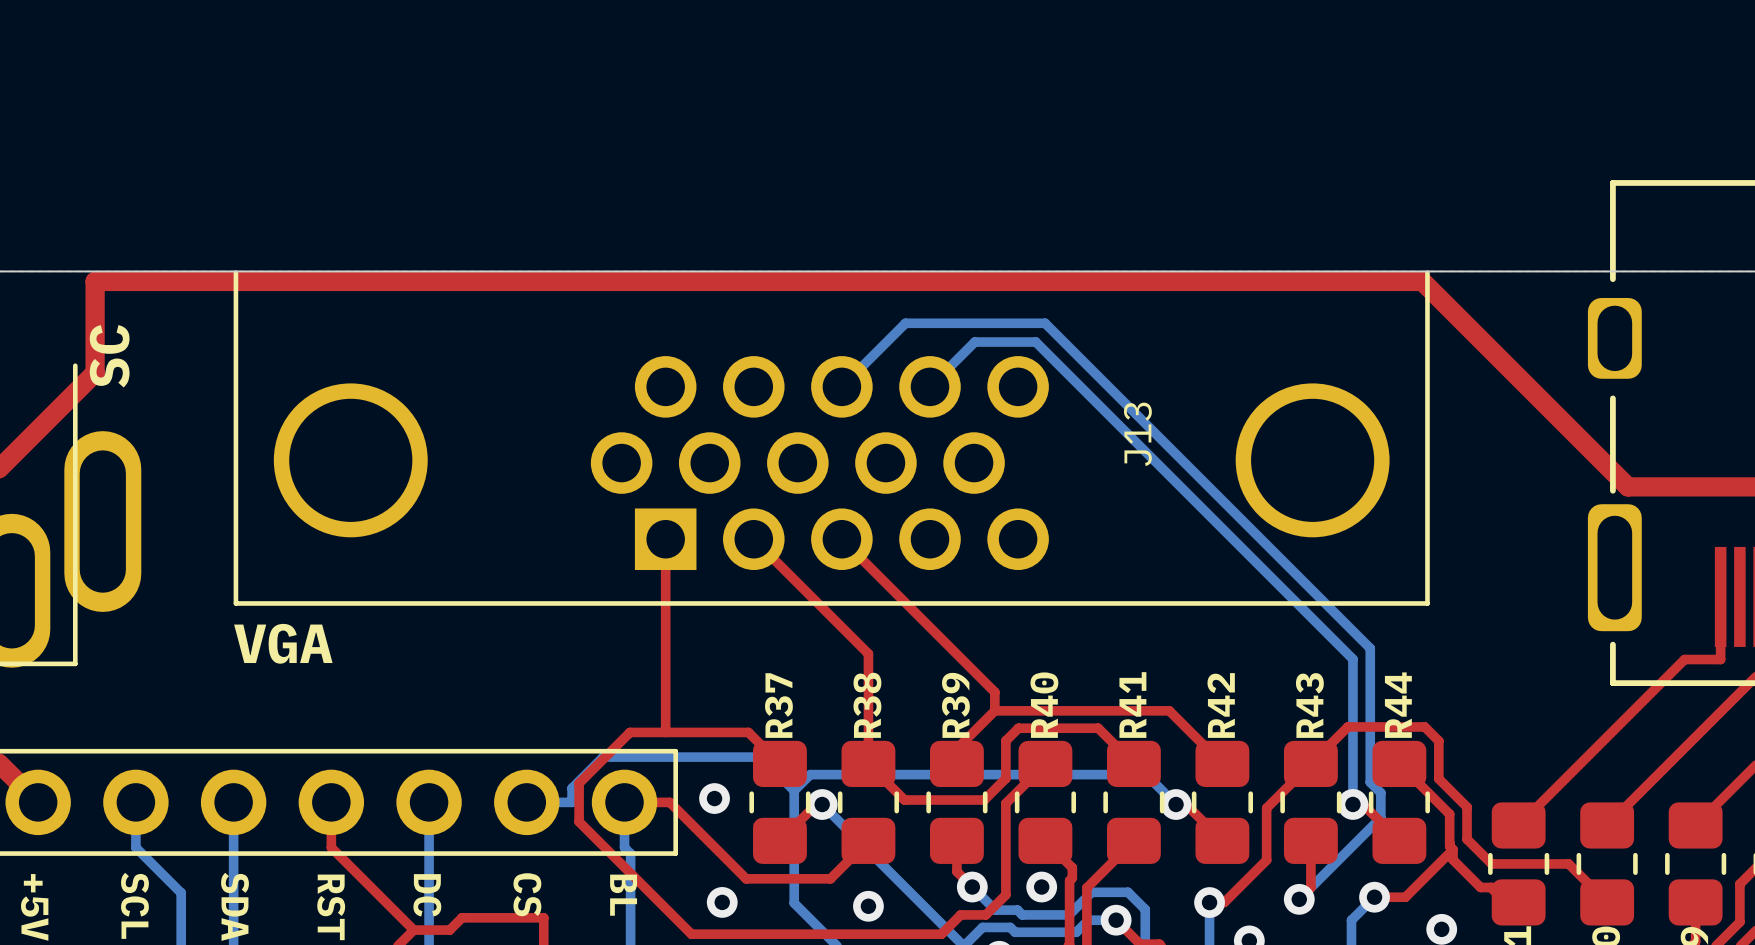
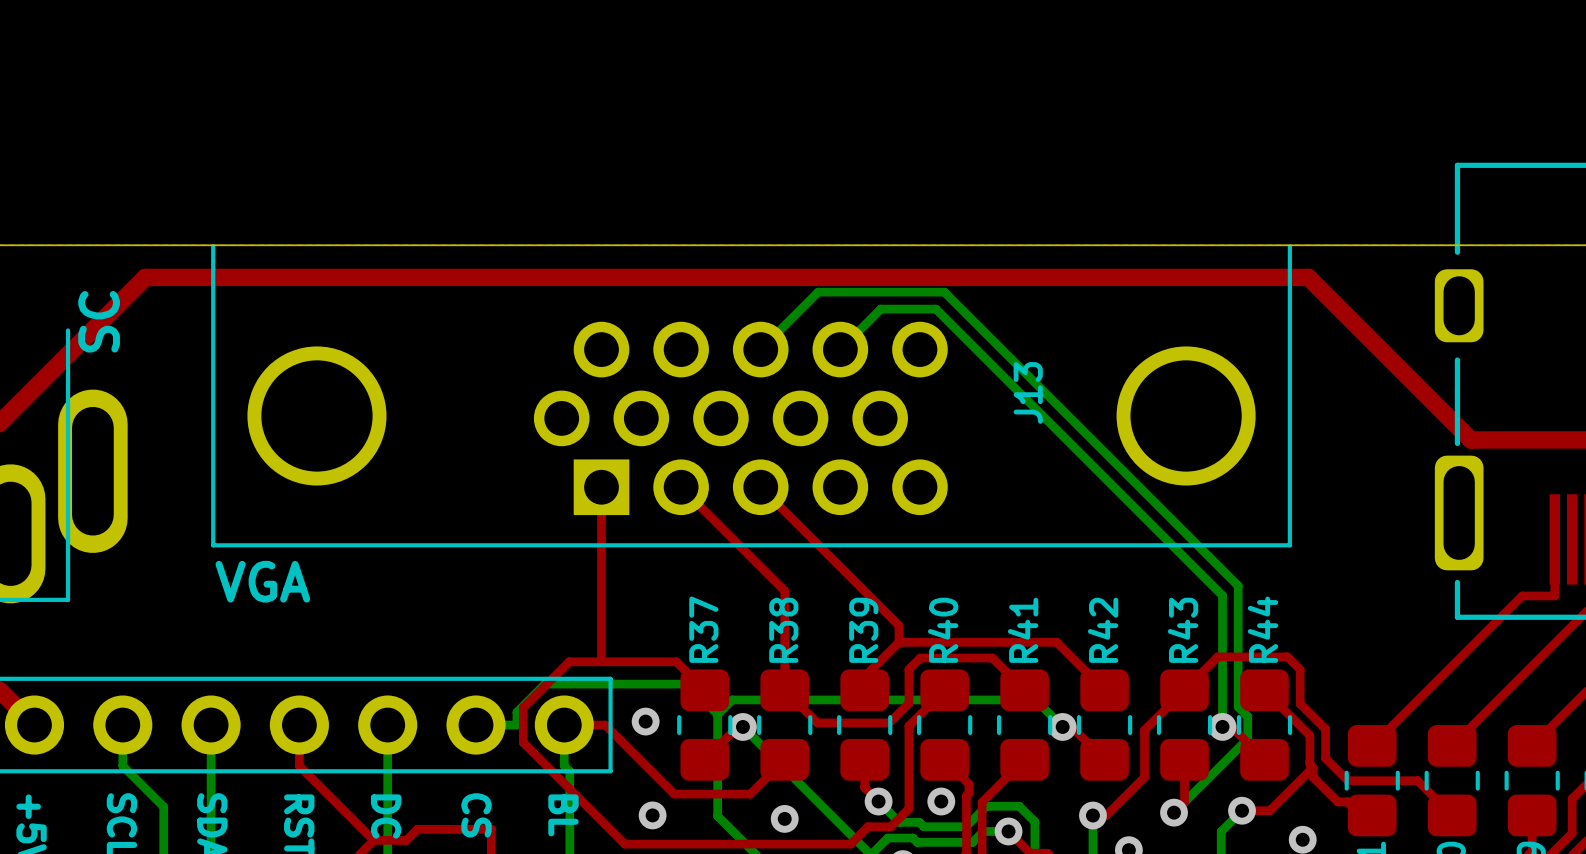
top track: (1448, 307) (1422, 281) (95, 281) (95, 372) -> (1308, 277) (145, 277) (85, 336)

